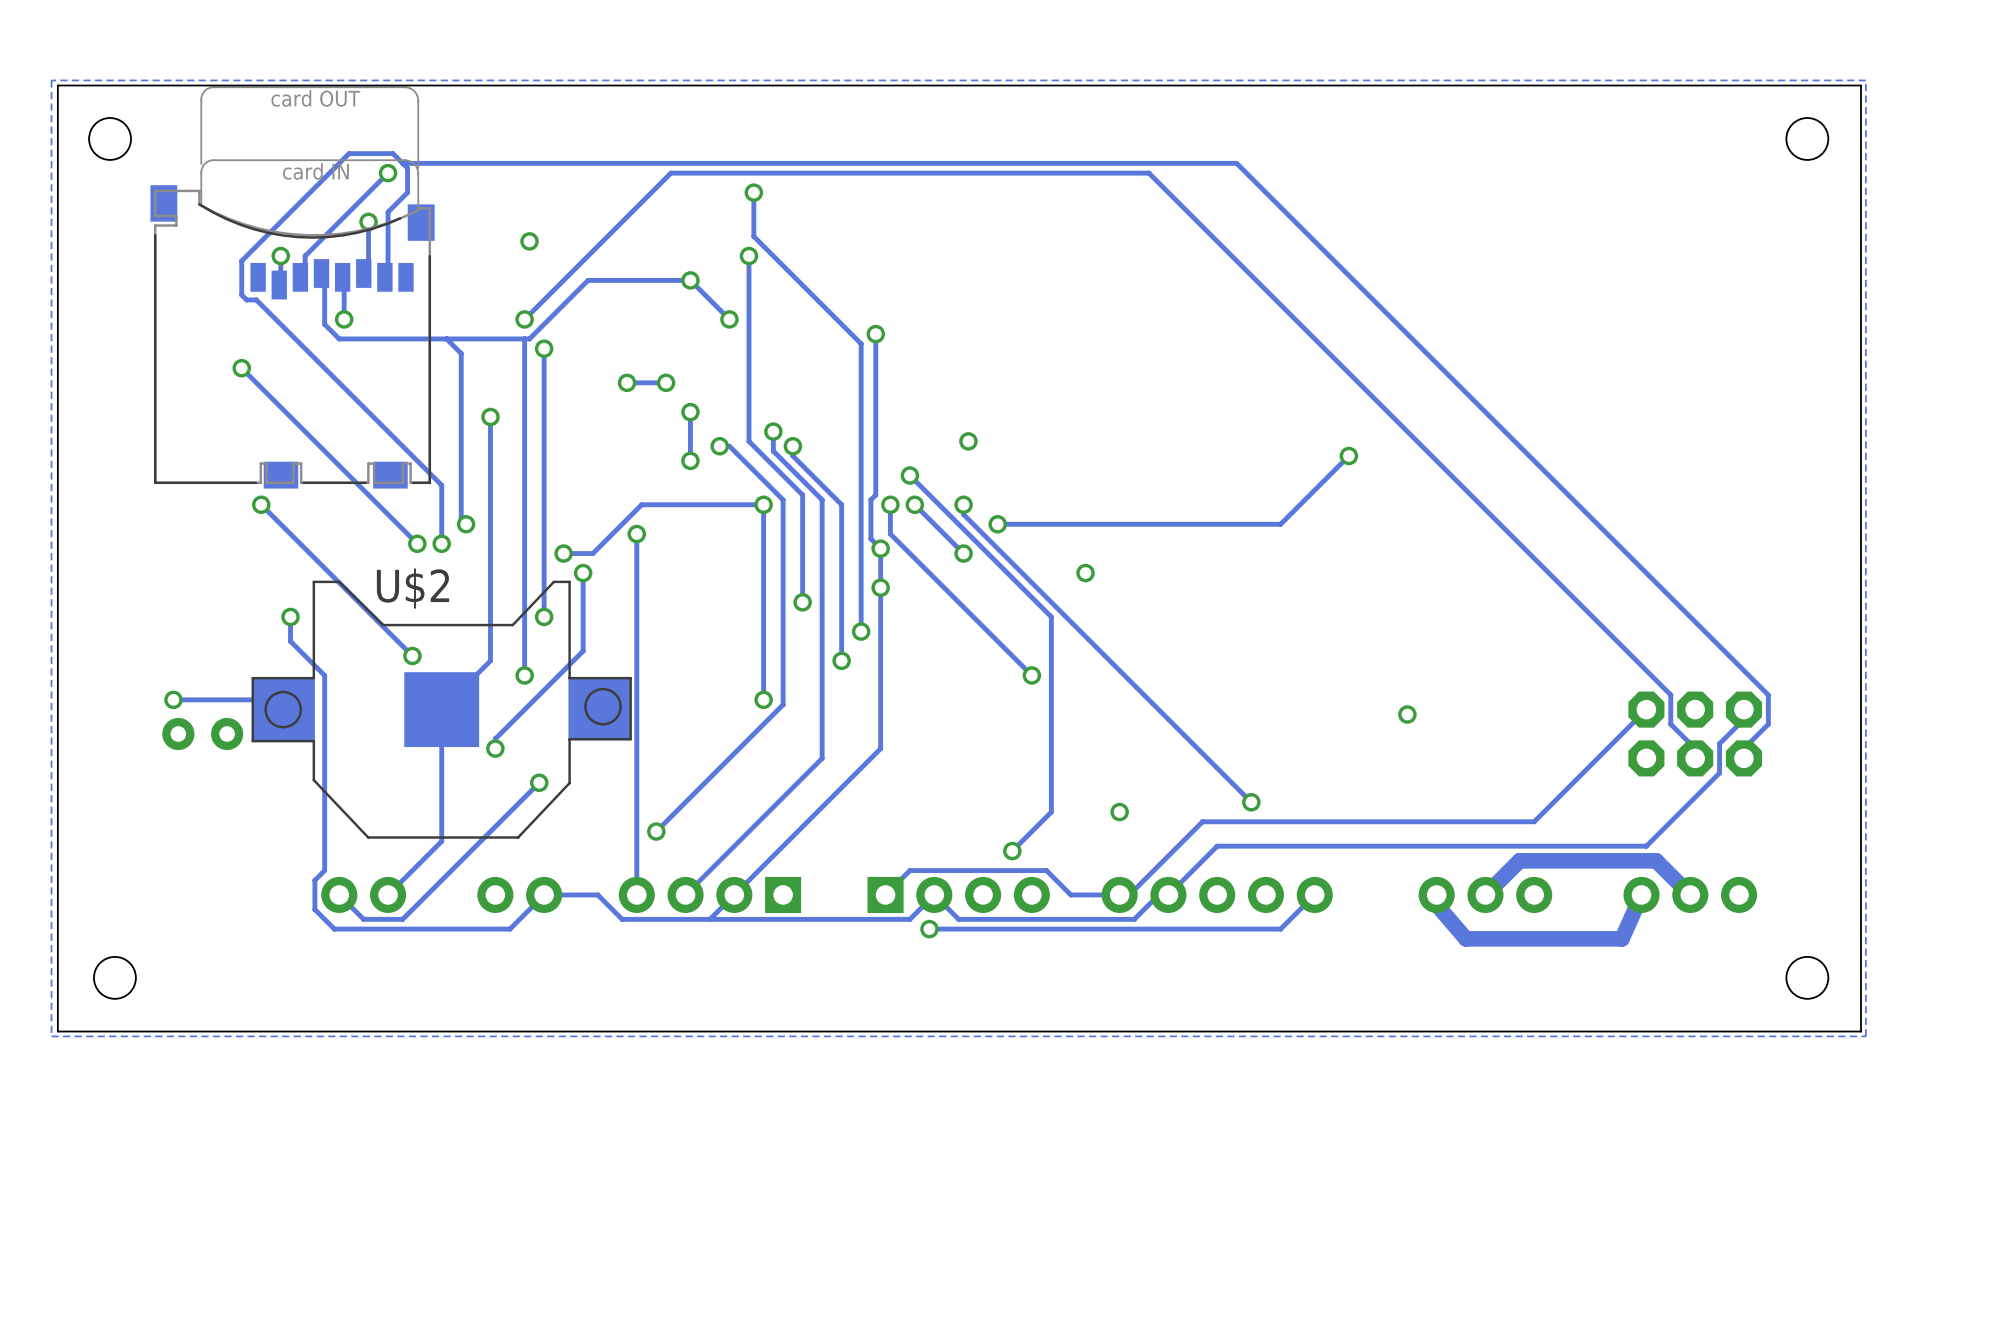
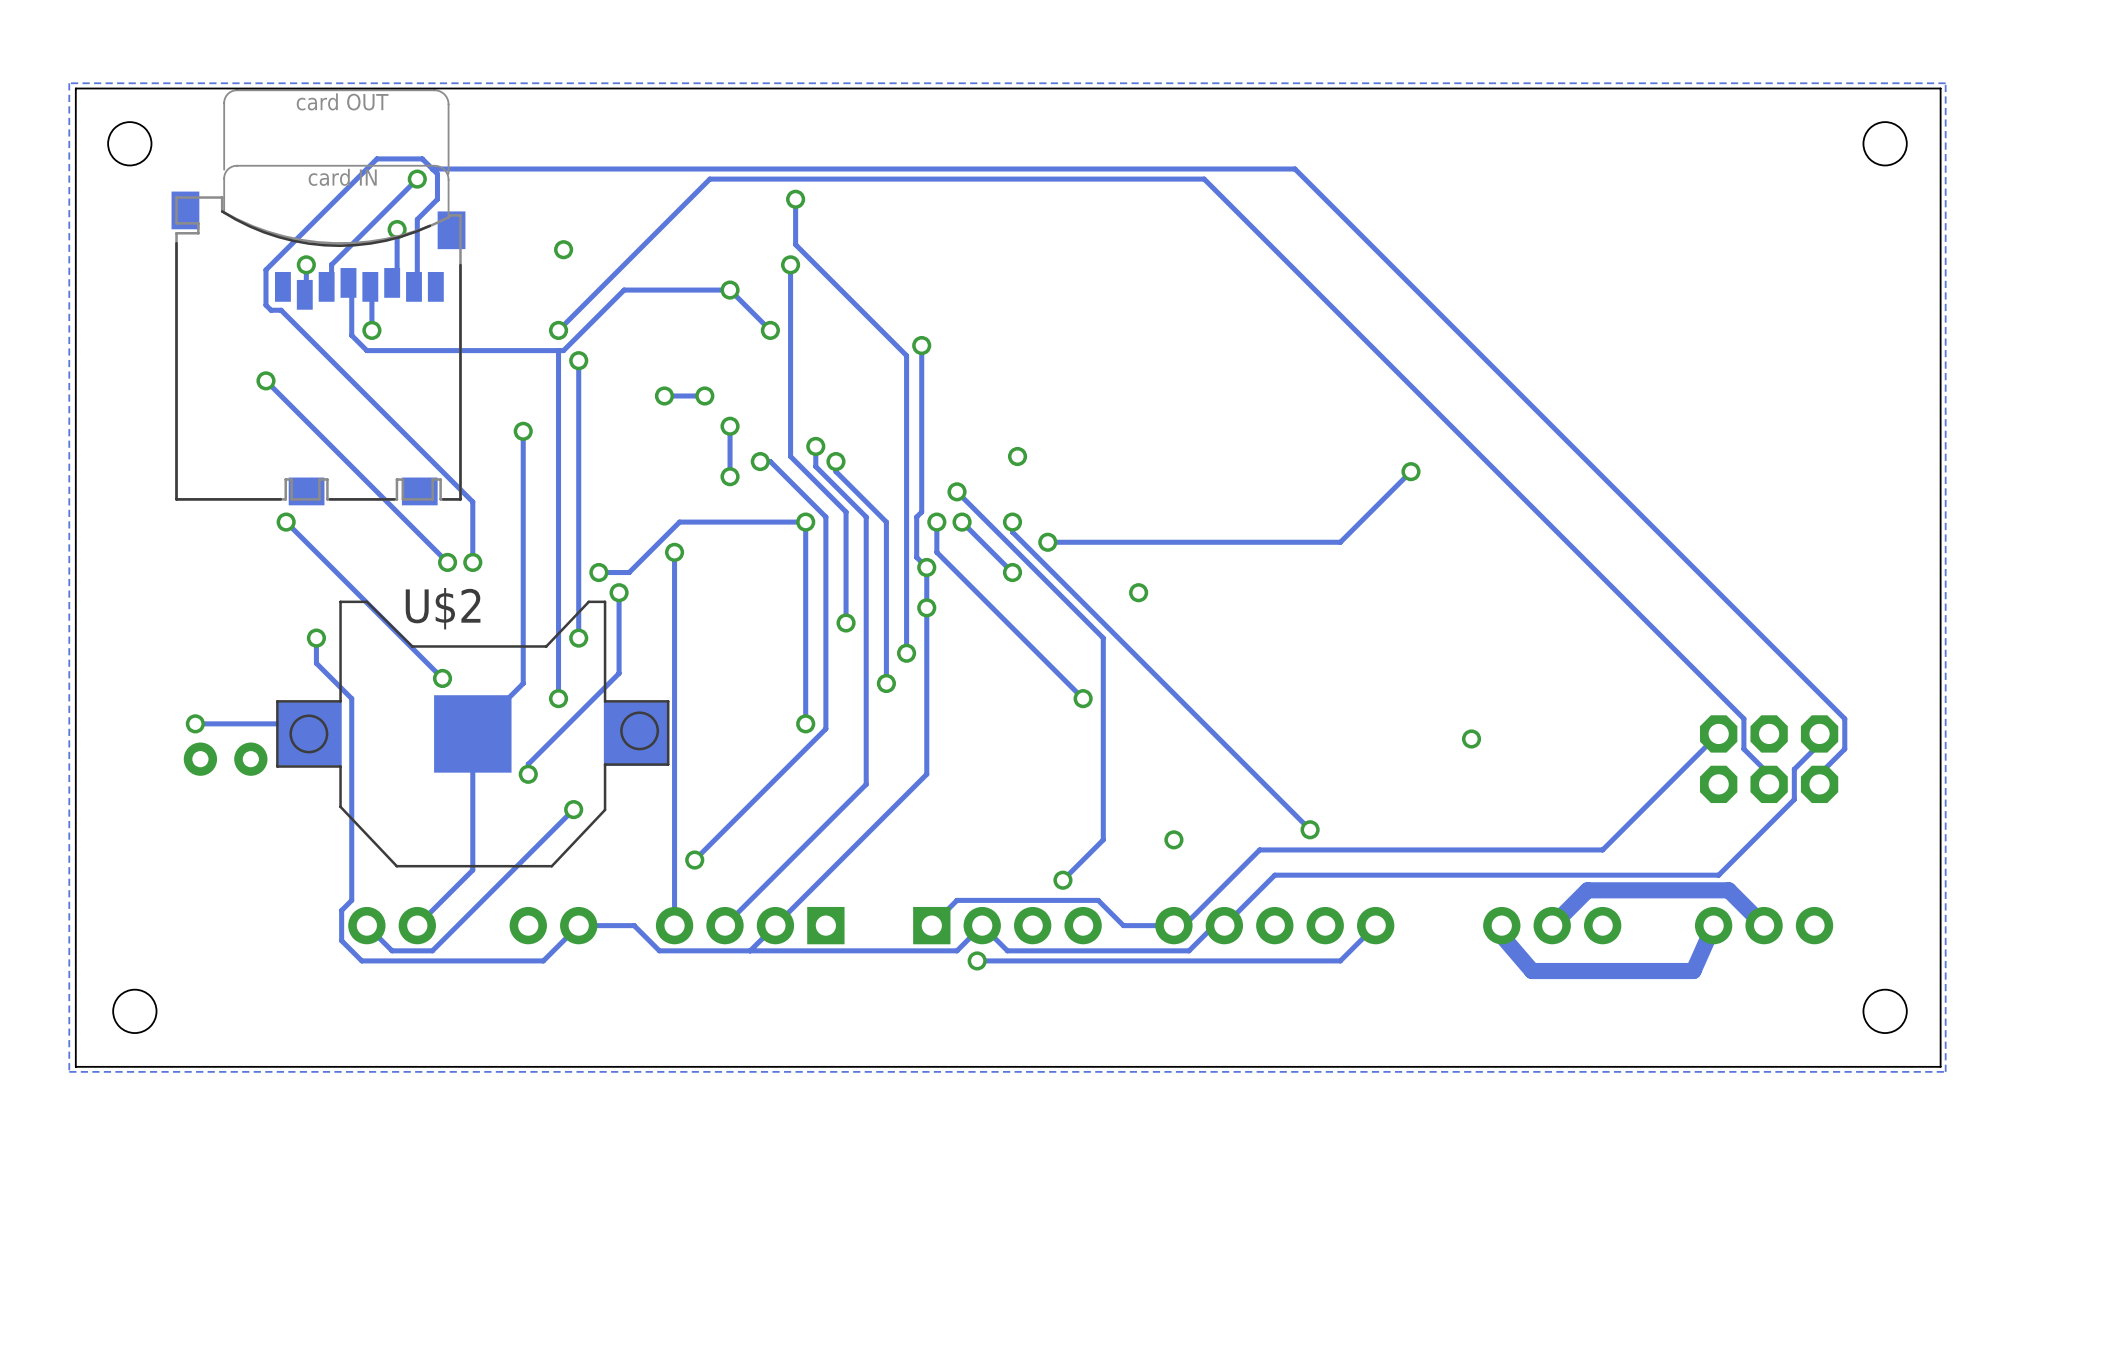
track: (446, 338) (461, 353) (461, 519) (466, 524) -> none
via: (466, 524) -> none

